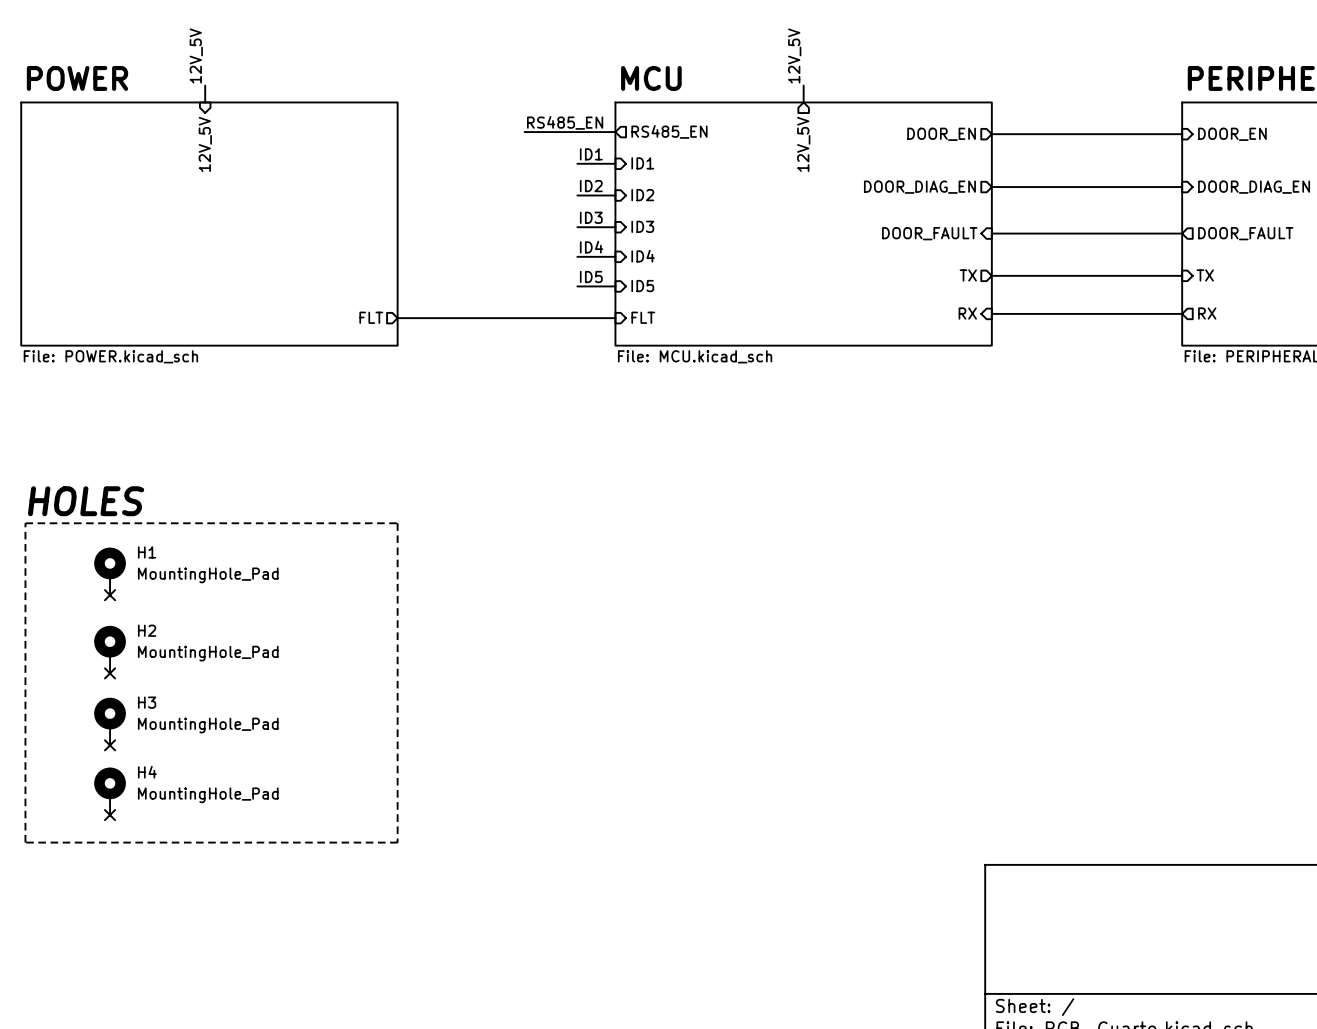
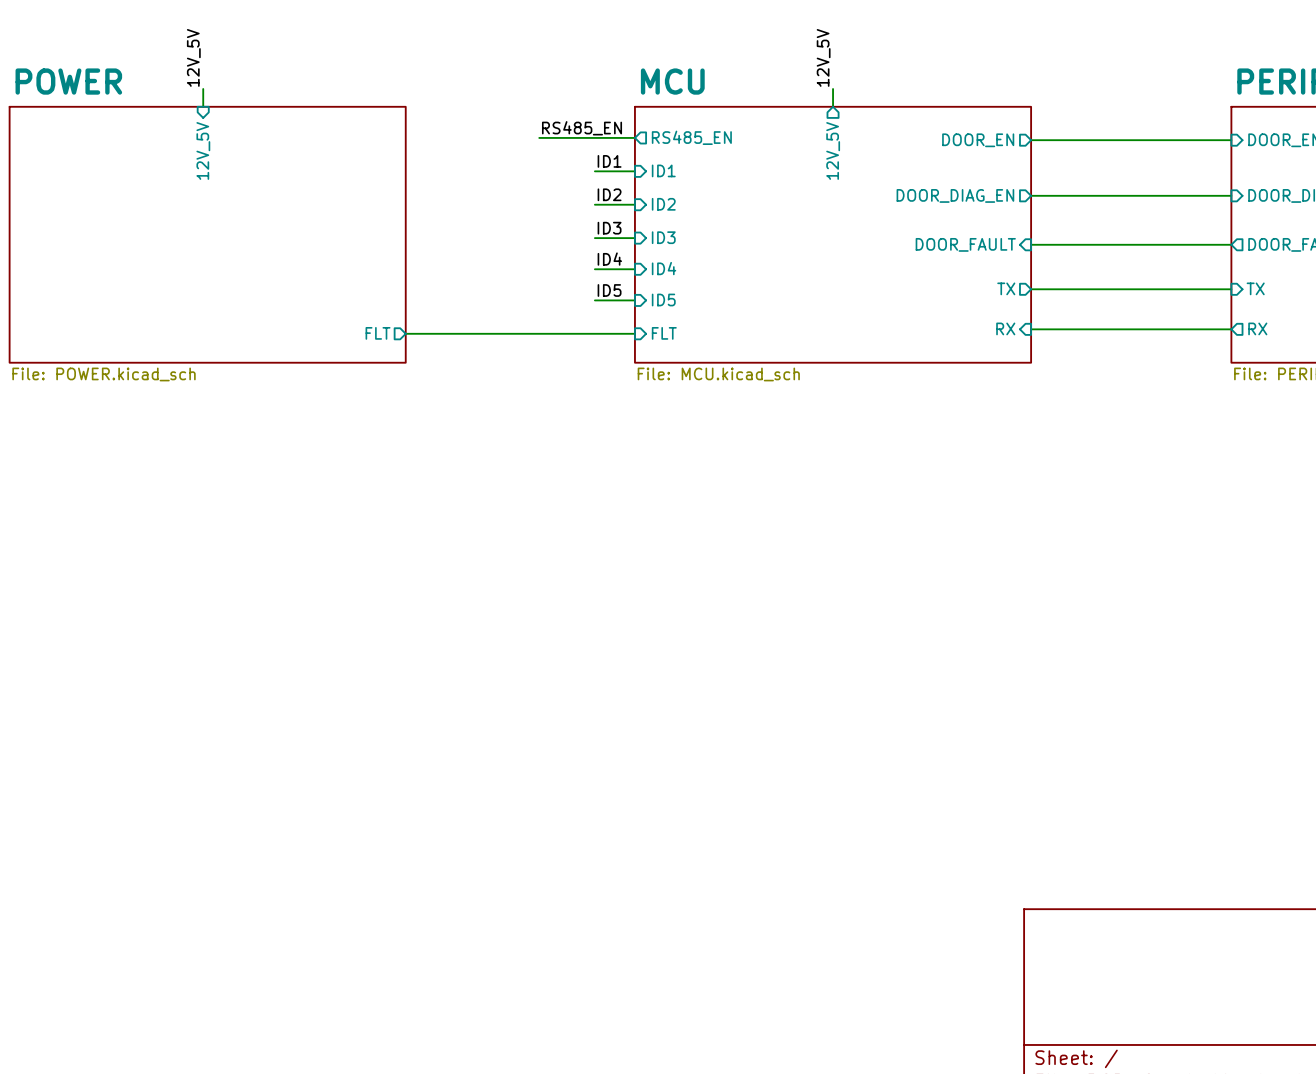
text: HOLES (86, 501) -> none
line: (25, 523) (397, 523) (397, 842) (25, 842) (25, 523) -> none
H1: MountingHole_Pad (110, 571) -> none
no-connect mark: (110, 595) -> none
H2: MountingHole_Pad (110, 649) -> none
no-connect mark: (110, 673) -> none
H3: MountingHole_Pad (110, 721) -> none
no-connect mark: (110, 745) -> none
H4: MountingHole_Pad (110, 791) -> none
no-connect mark: (110, 815) -> none

